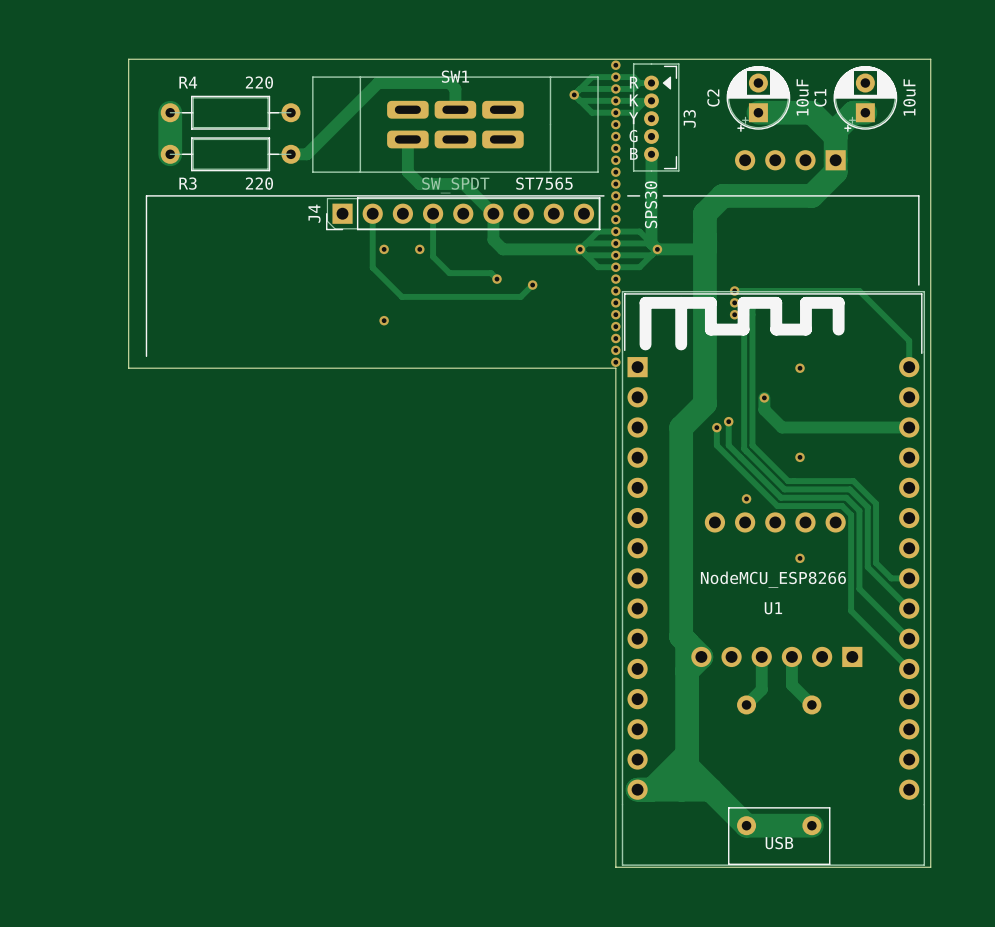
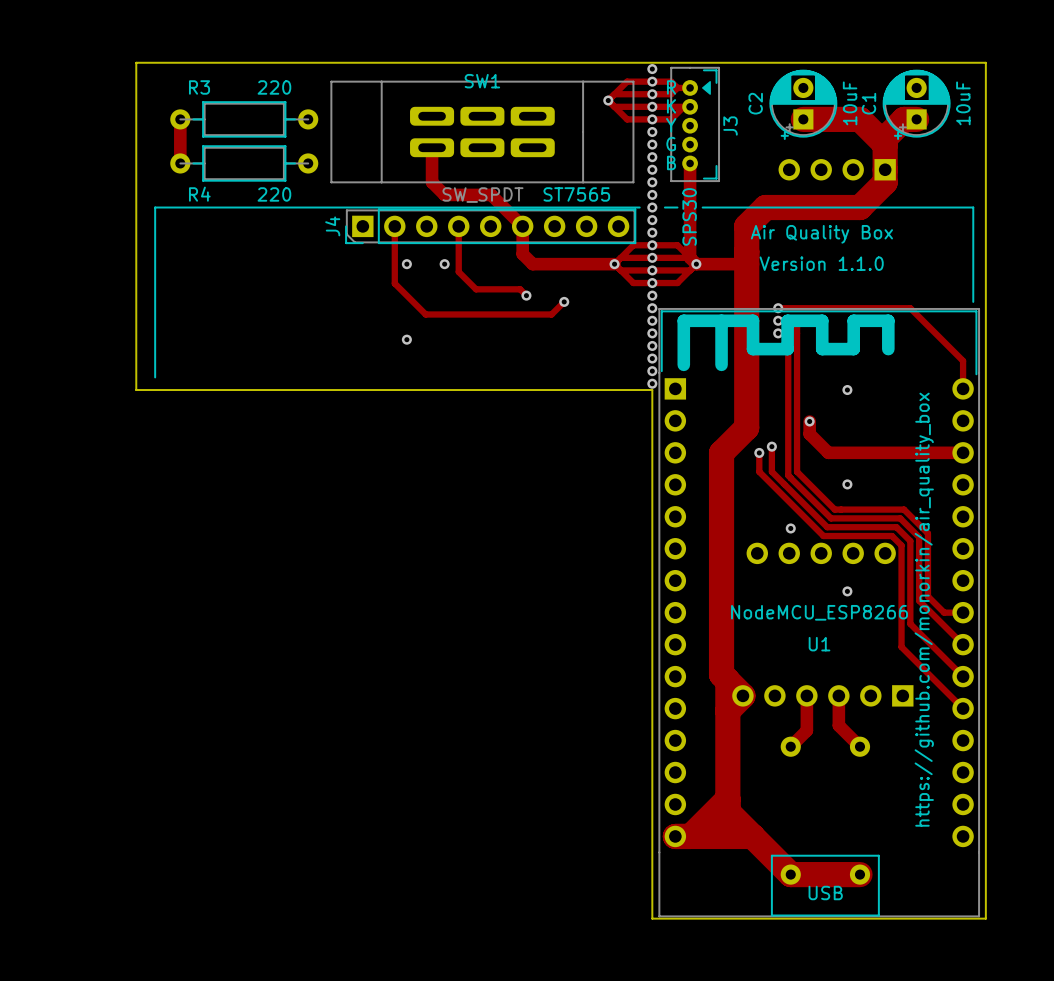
R4 name: R4 (188, 82) -> R3 (199, 87)
track: (455, 109) (455, 88) (449, 83) (378, 83) (306, 154) (290, 154) -> none
track width: thick (170, 112) (170, 154) -> thin (180, 119) (180, 163)
R3 name: R3 (188, 183) -> R4 (199, 194)
text: none -> Air Quality Box (821, 234)
text: none -> Version 1.1.0 (821, 263)
text: none -> https://github.com/monorkin/air_quality_box (924, 609)

